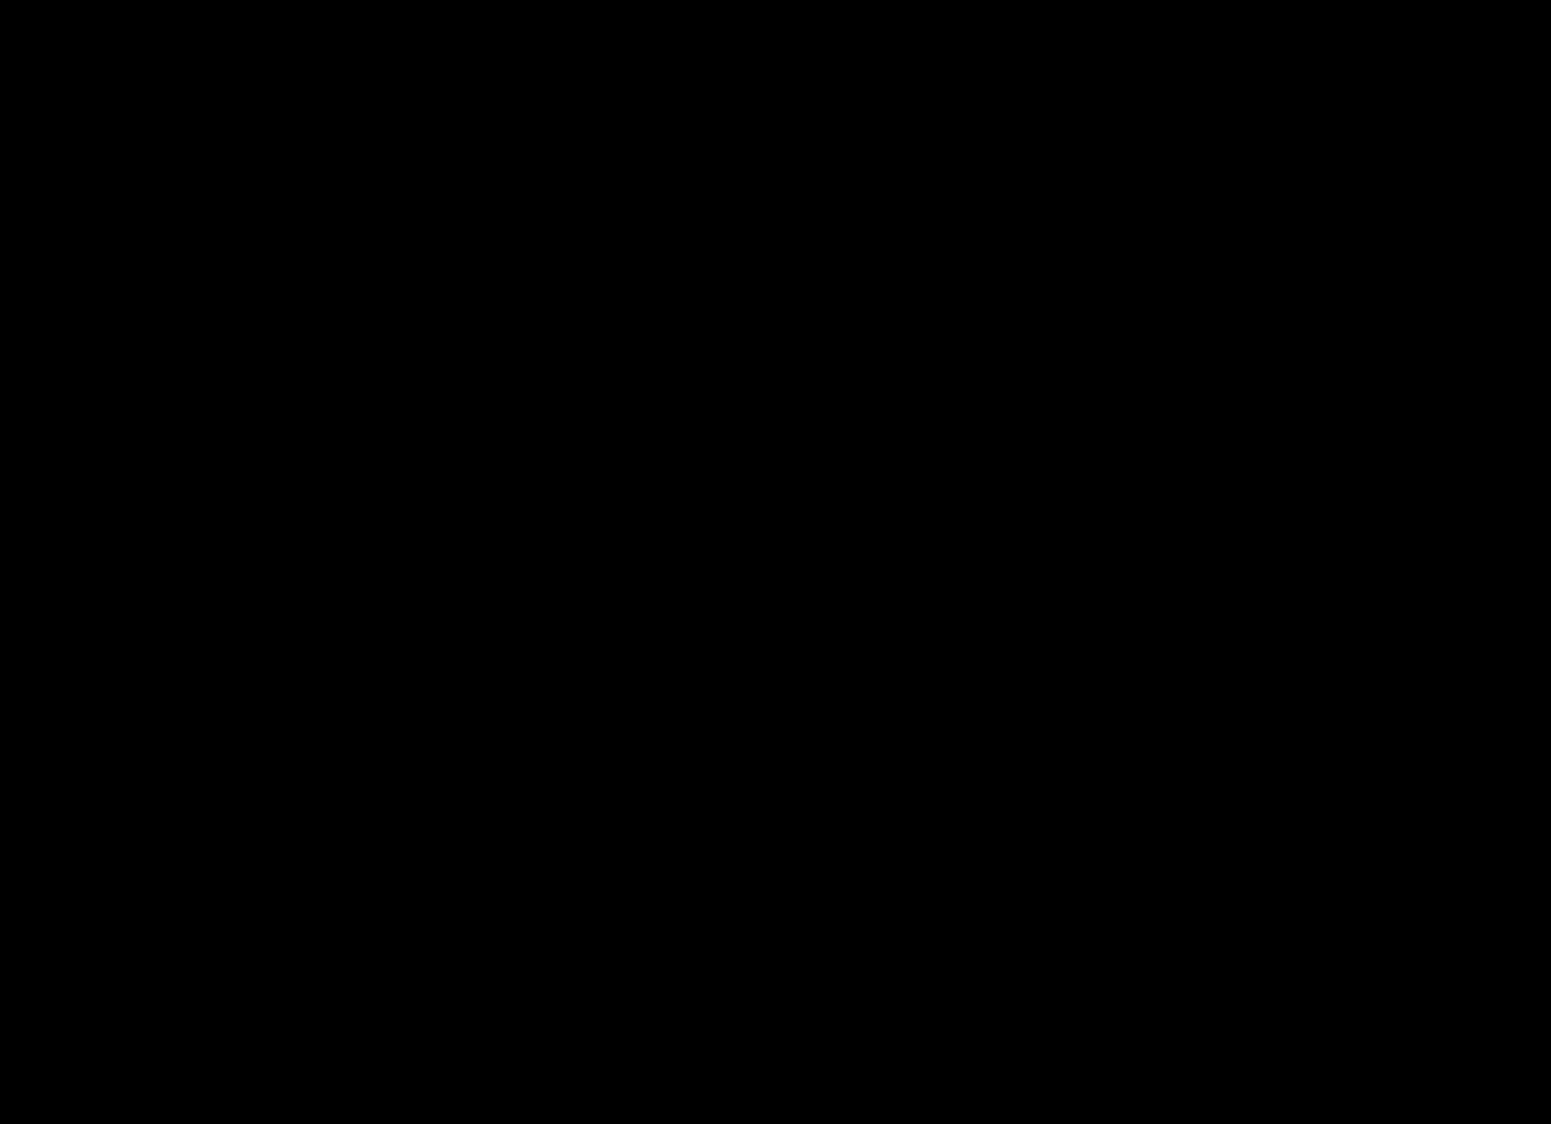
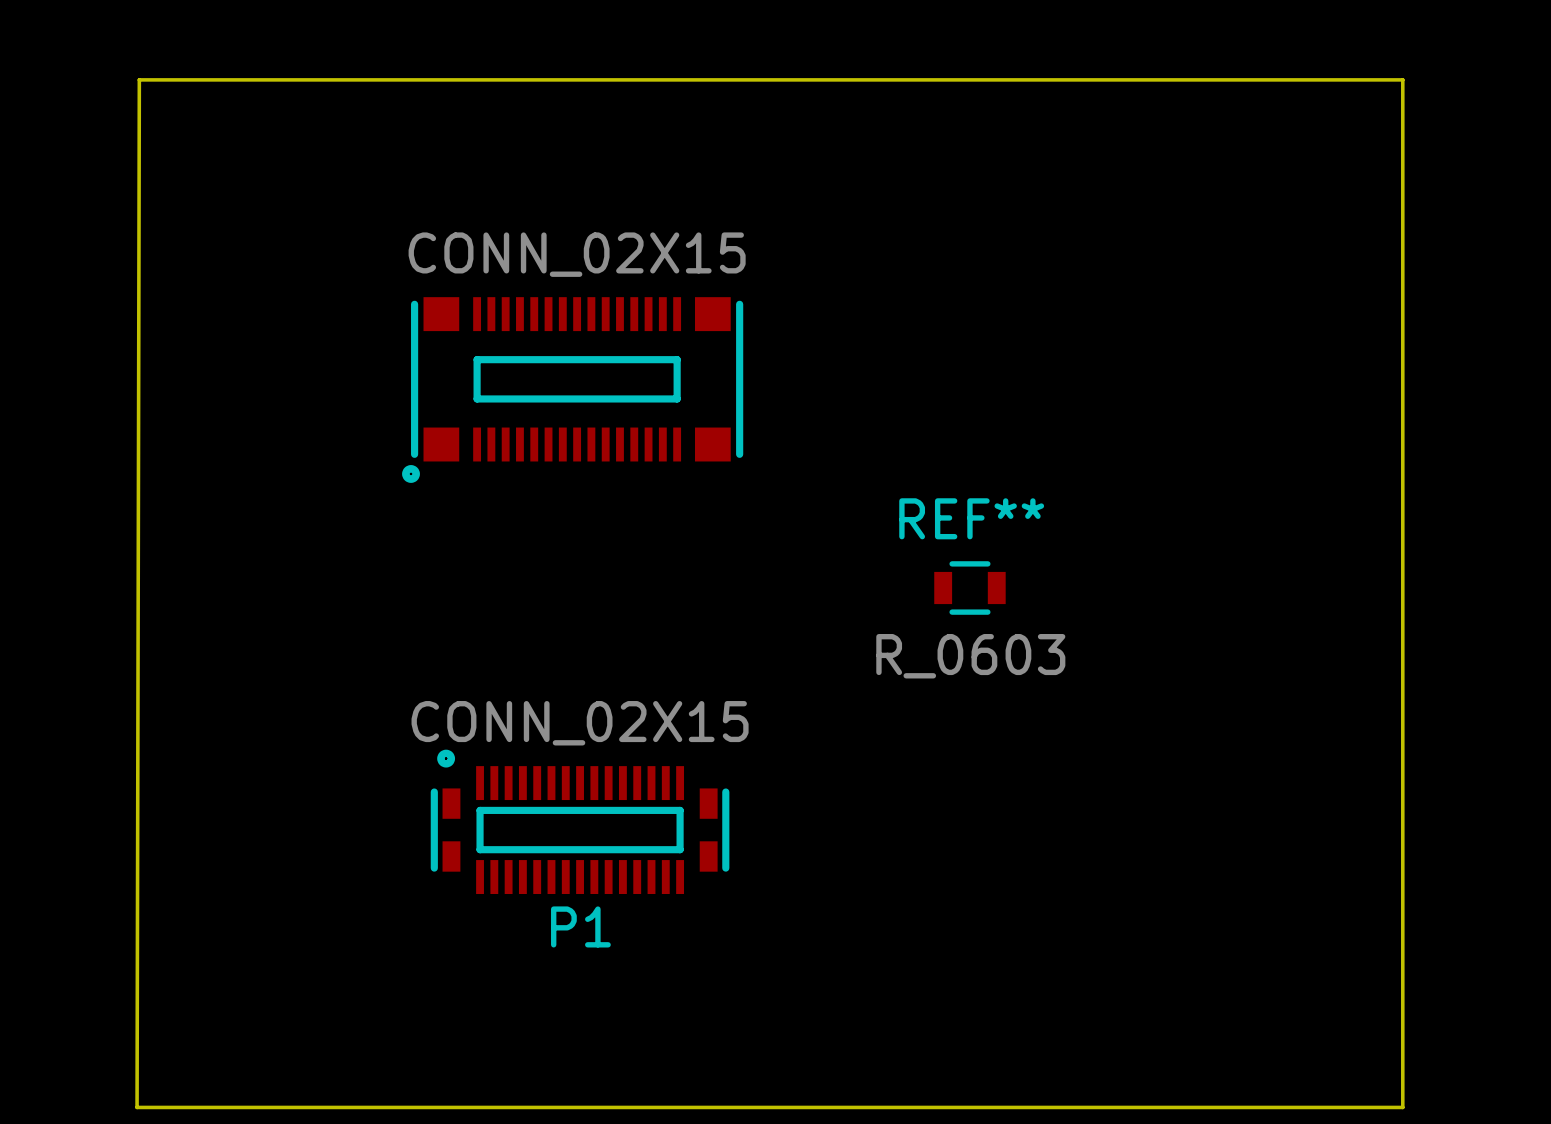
board edge: none -> (139, 79) (137, 1107) (1402, 1107) (1402, 79) (139, 79)
part: none -> CONN_02X15 (572, 390)
REF**: none -> R_0603 (969, 588)
P1: none -> CONN_02X15 (580, 821)

